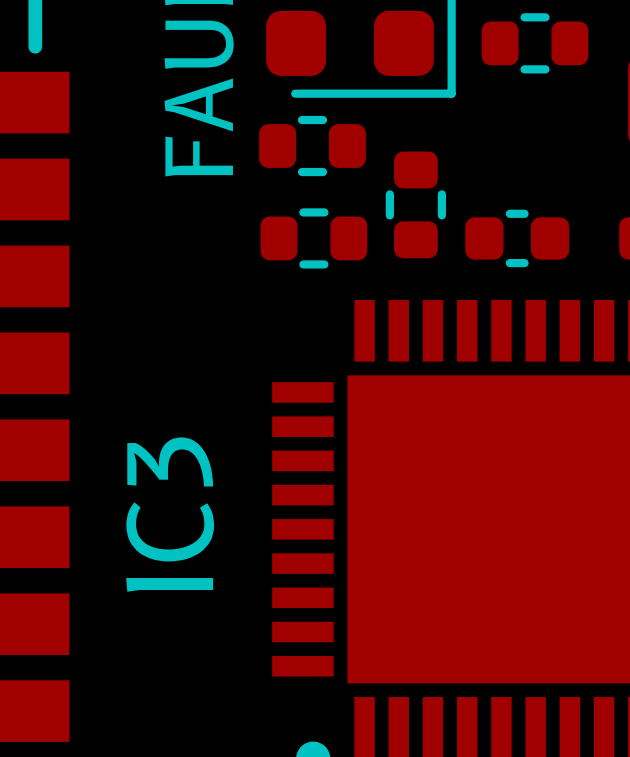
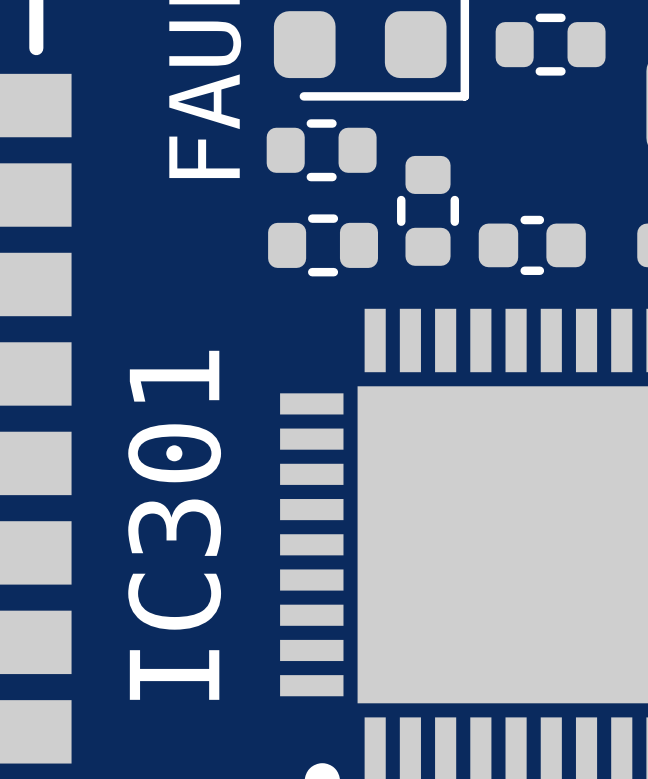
IC3 name: IC3 (170, 514) -> IC301 (174, 525)

